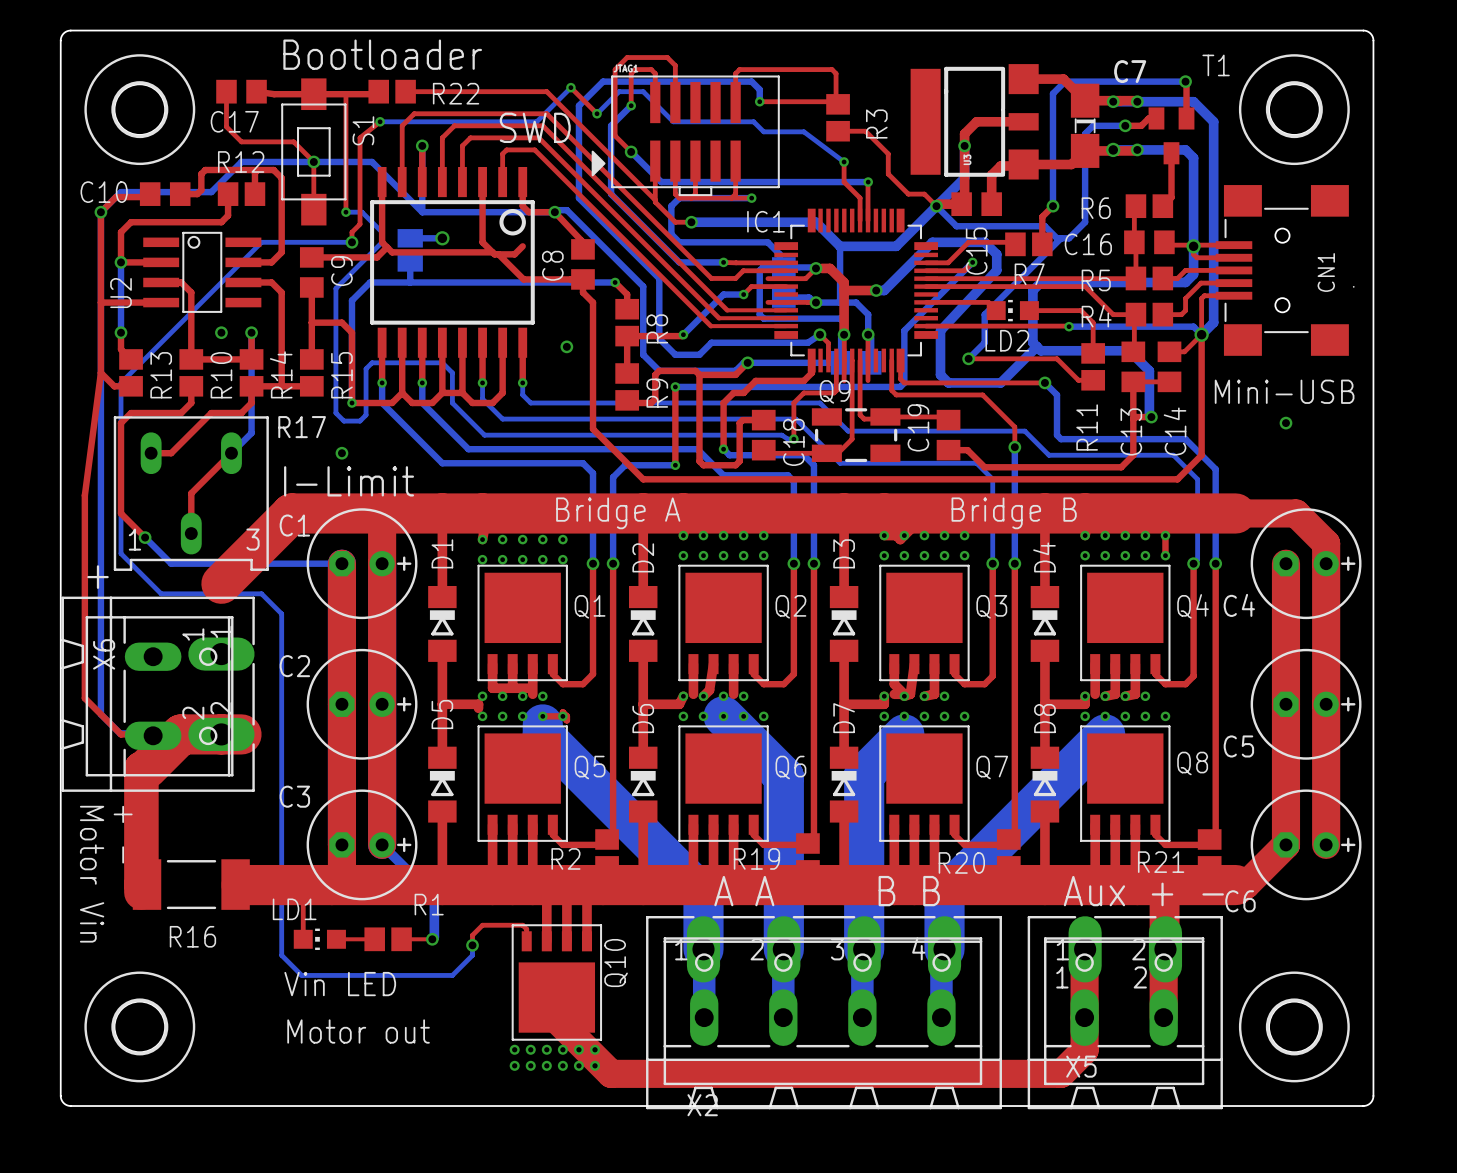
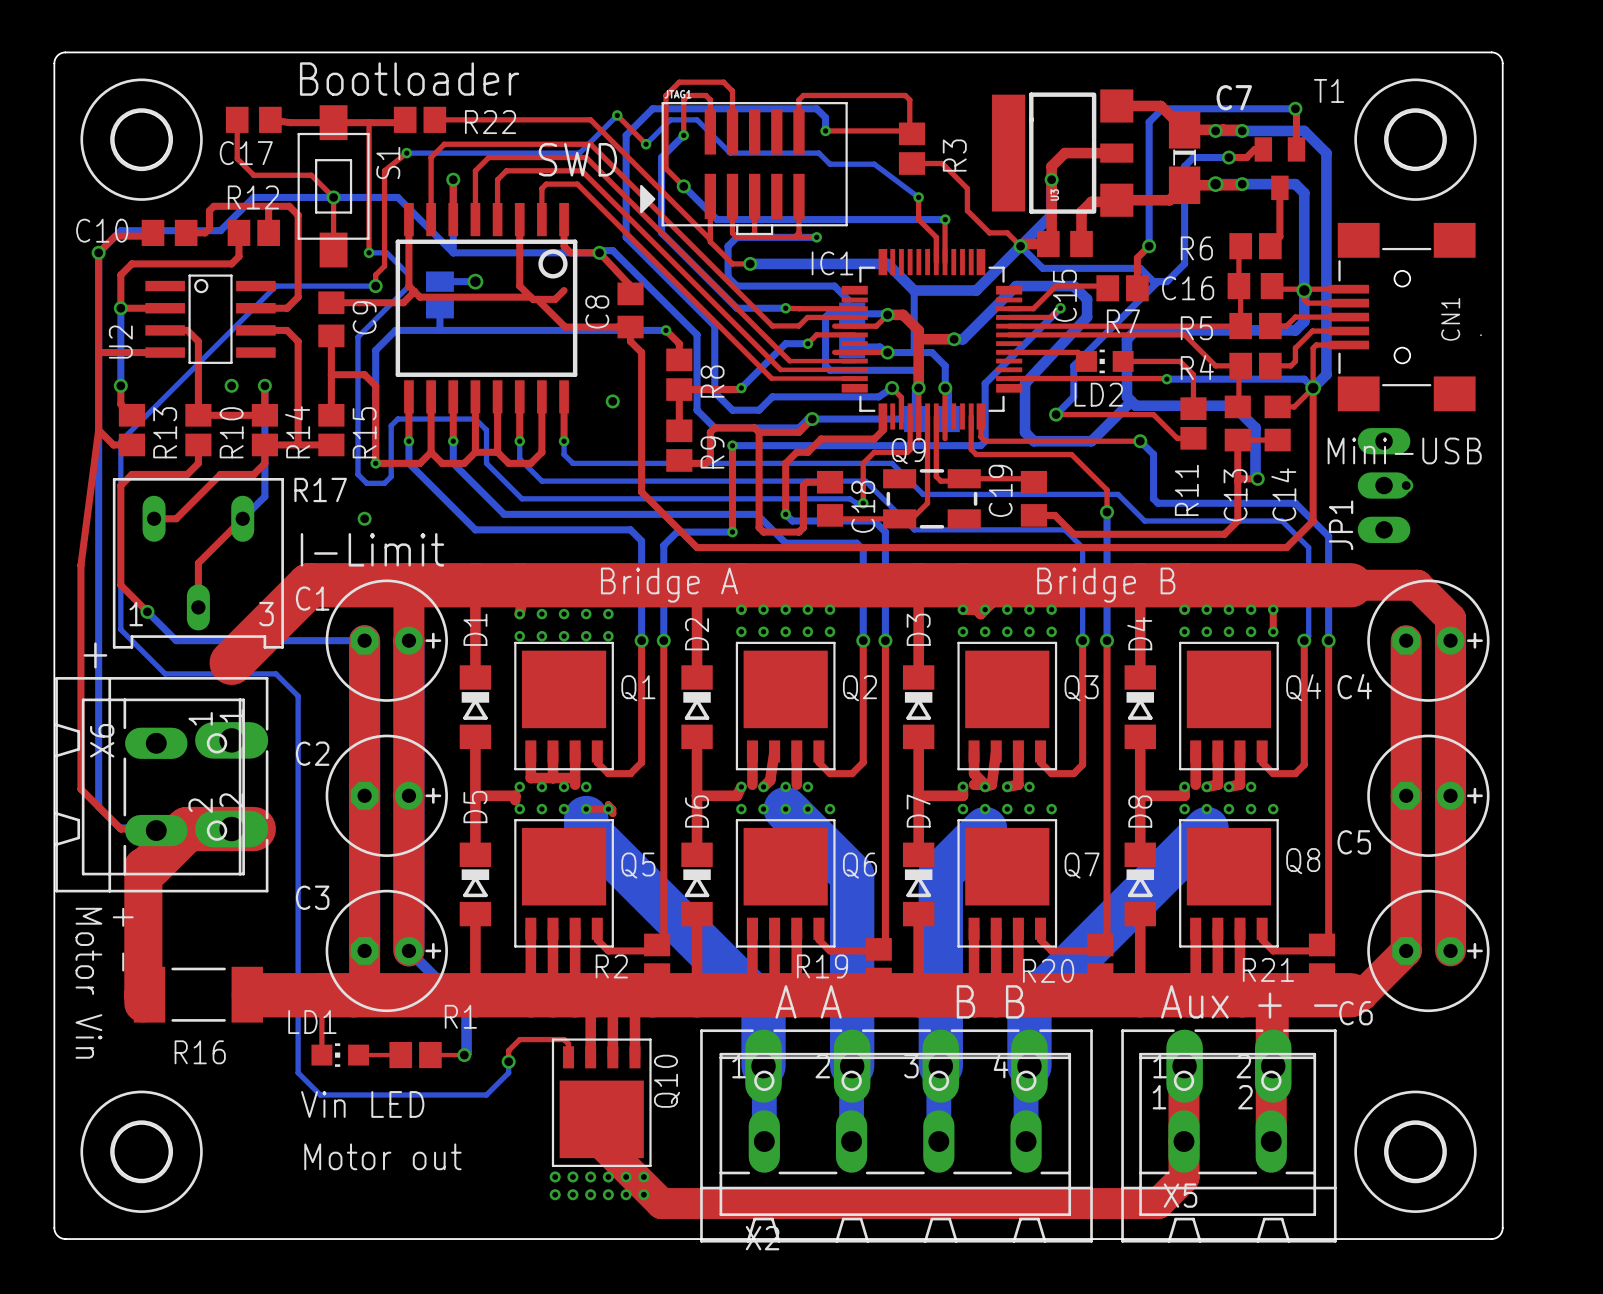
JP1: none -> (1384, 485)

